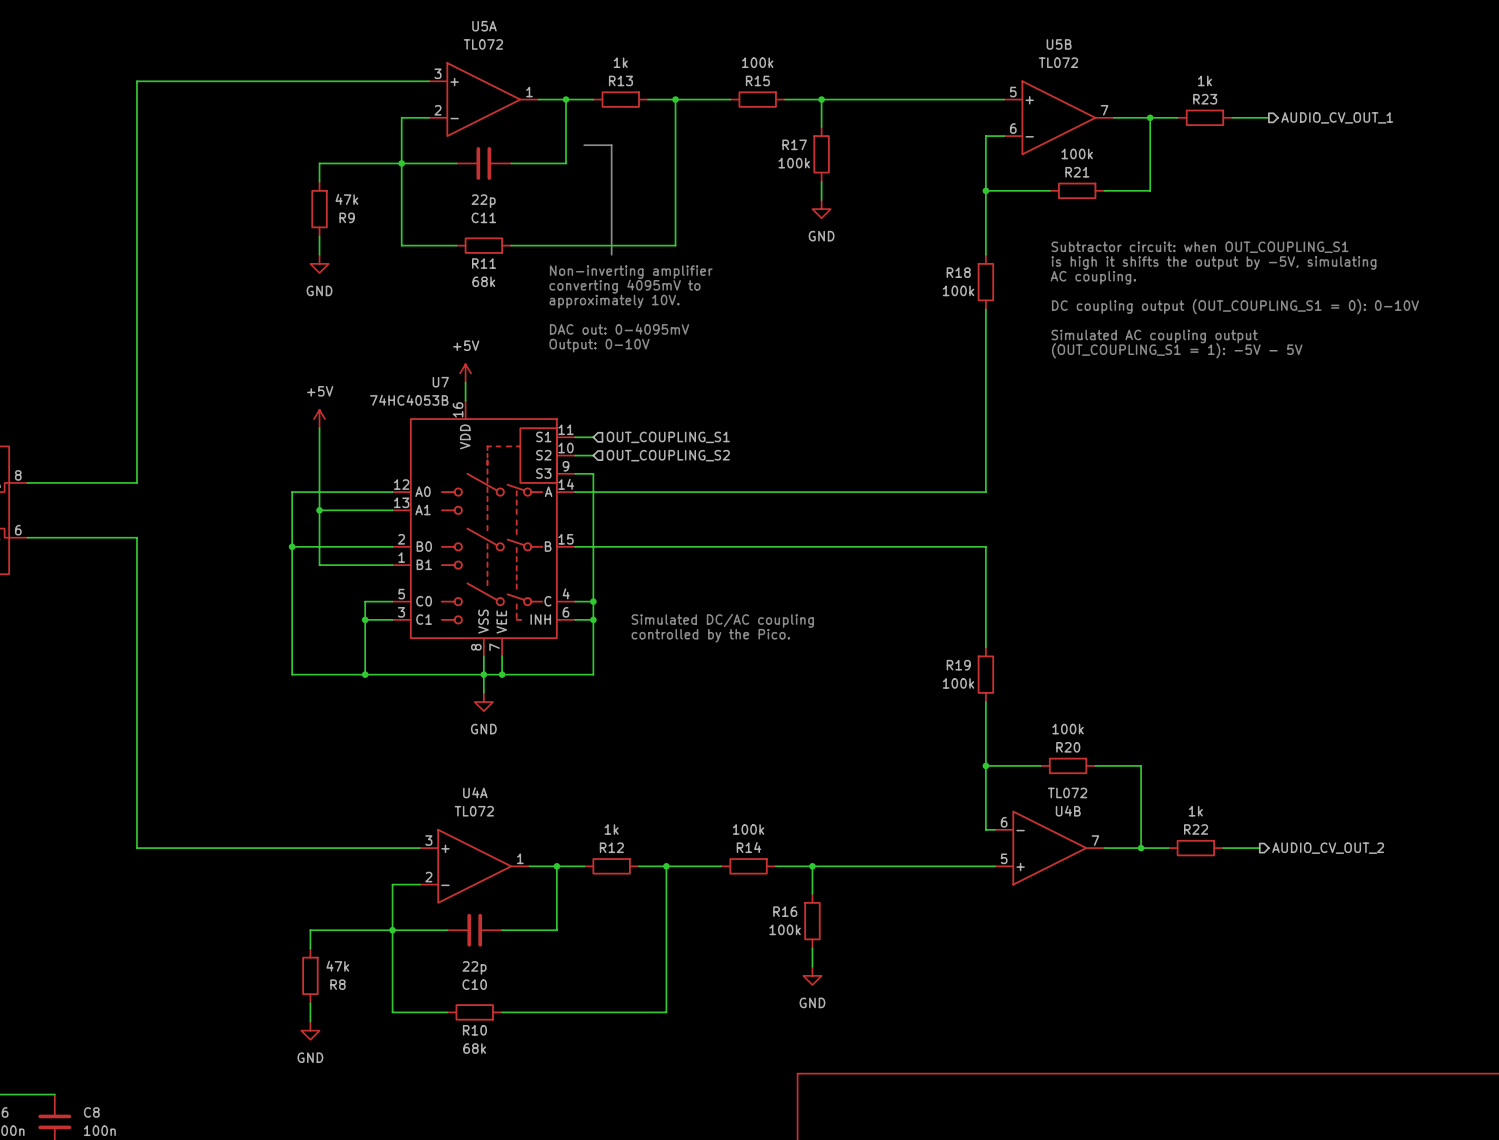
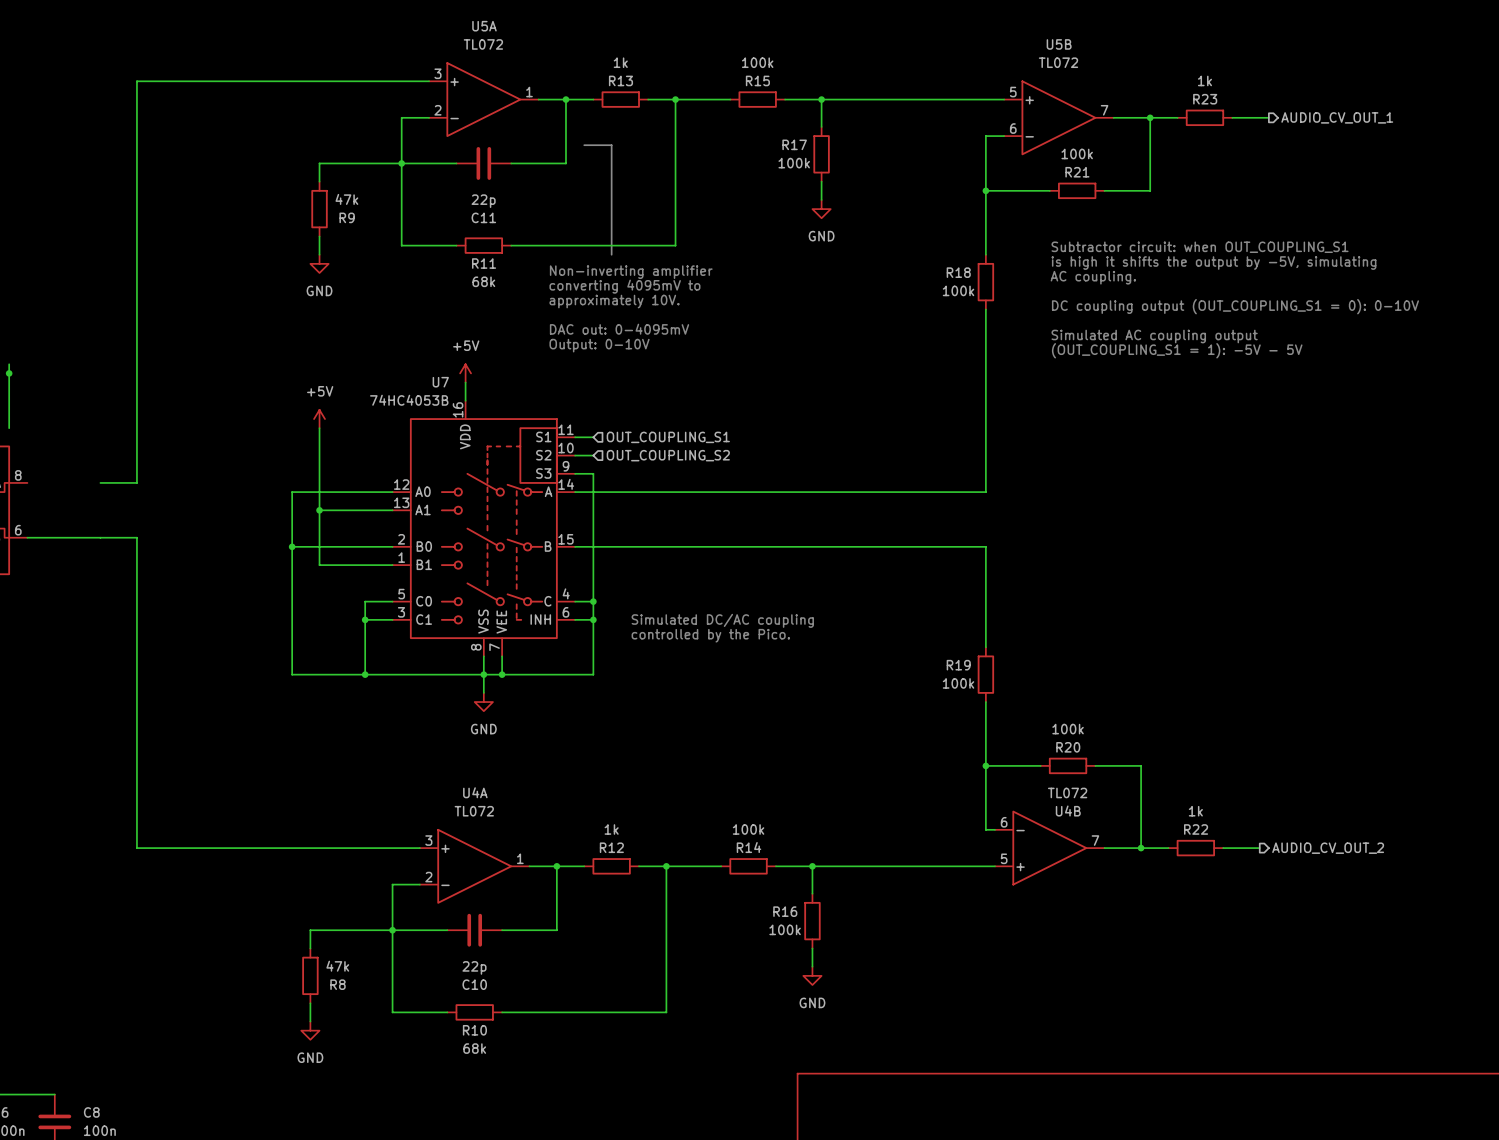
wire: none -> (9, 364) (9, 428)
junction: none -> (9, 373)
wire: (27, 482) (100, 482) -> none

